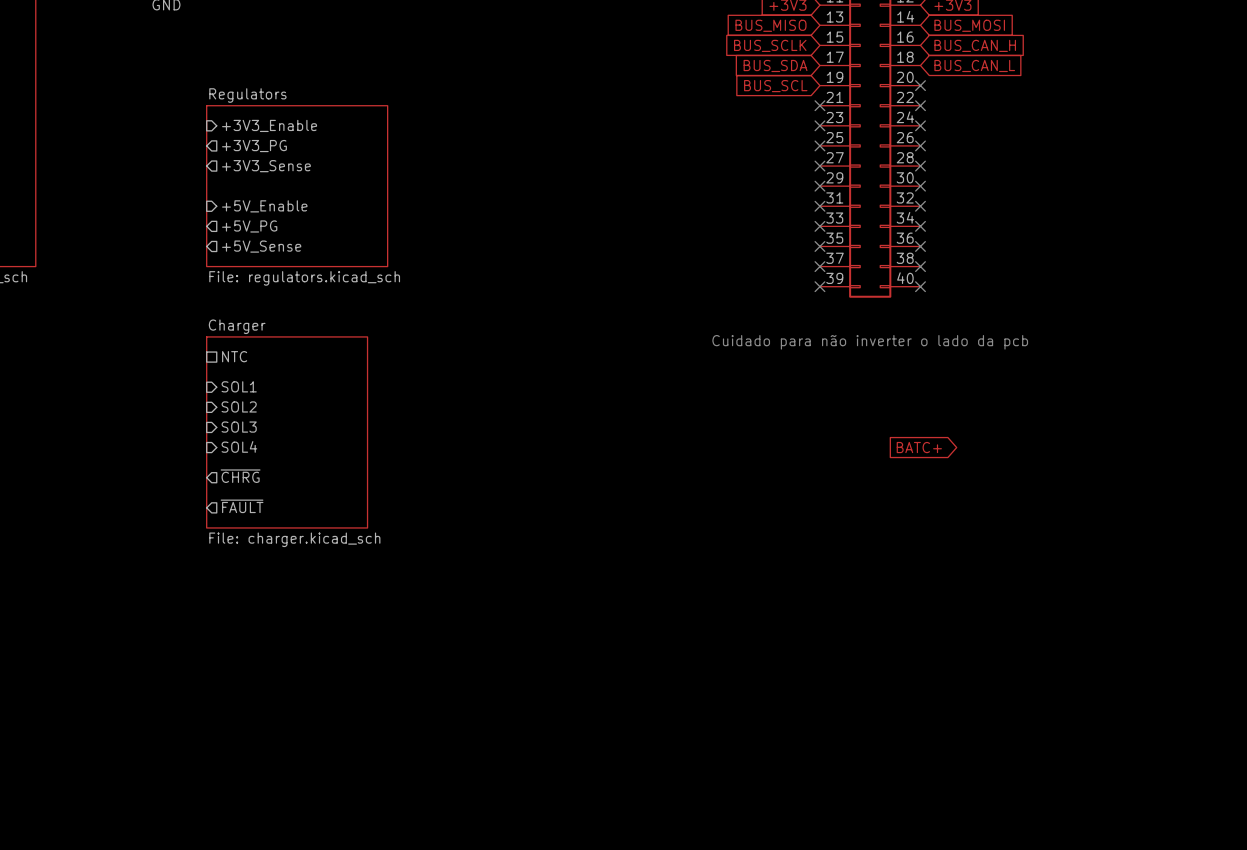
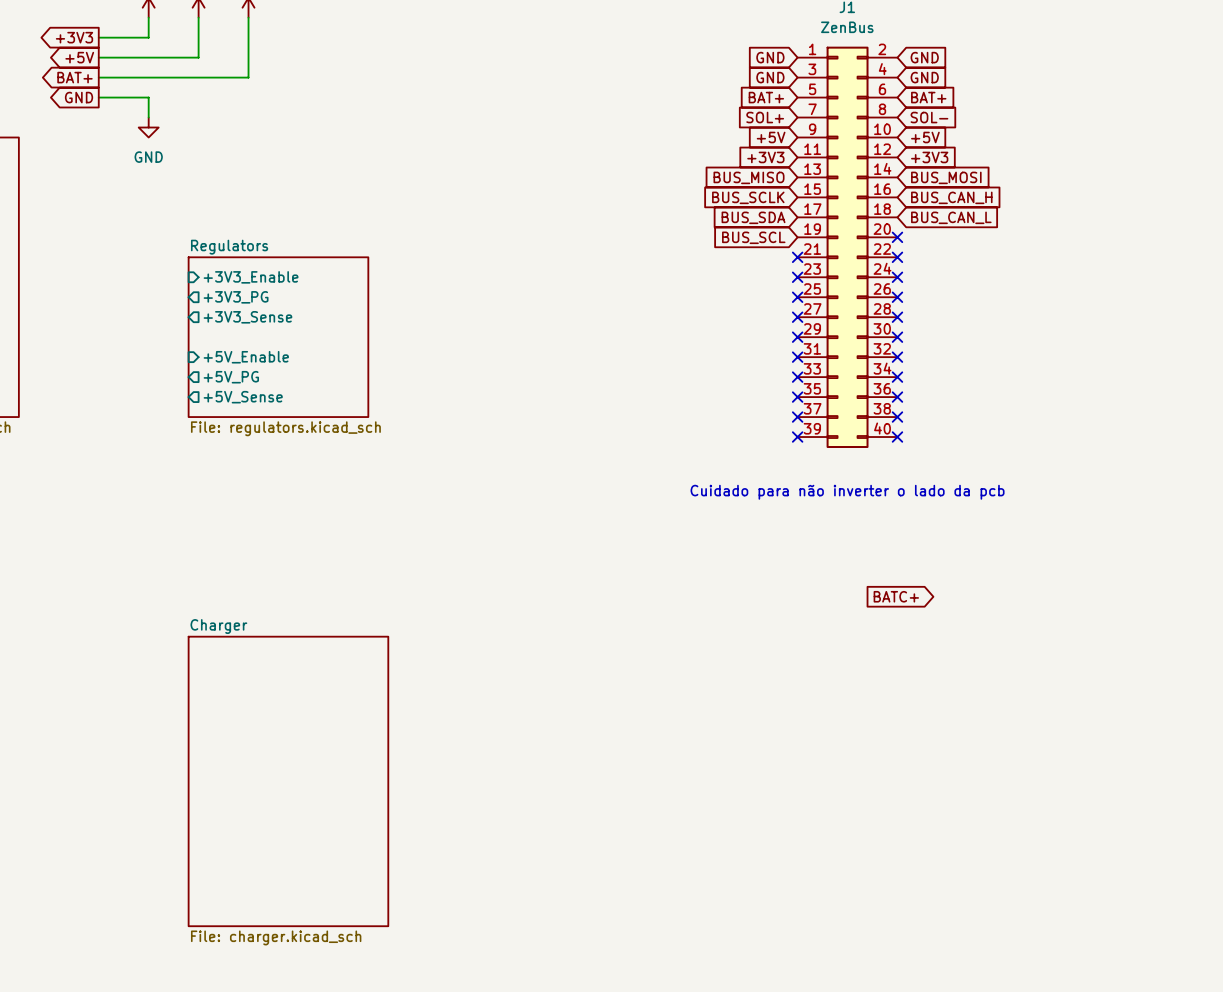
sheet pin: NTC (234, 356) -> none
sheet pin: SOL1 (239, 386) -> none
sheet pin: SOL2 (239, 406) -> none
sheet pin: SOL3 (239, 427) -> none
sheet Charger: File: charger.kicad_sch (287, 432) -> none
sheet pin: SOL4 (239, 446) -> none
sheet pin: ~{CHRG} (240, 476) -> none
sheet pin: ~{FAULT} (242, 506) -> none
sheet Charger: none -> File: charger.kicad_sch (288, 781)

